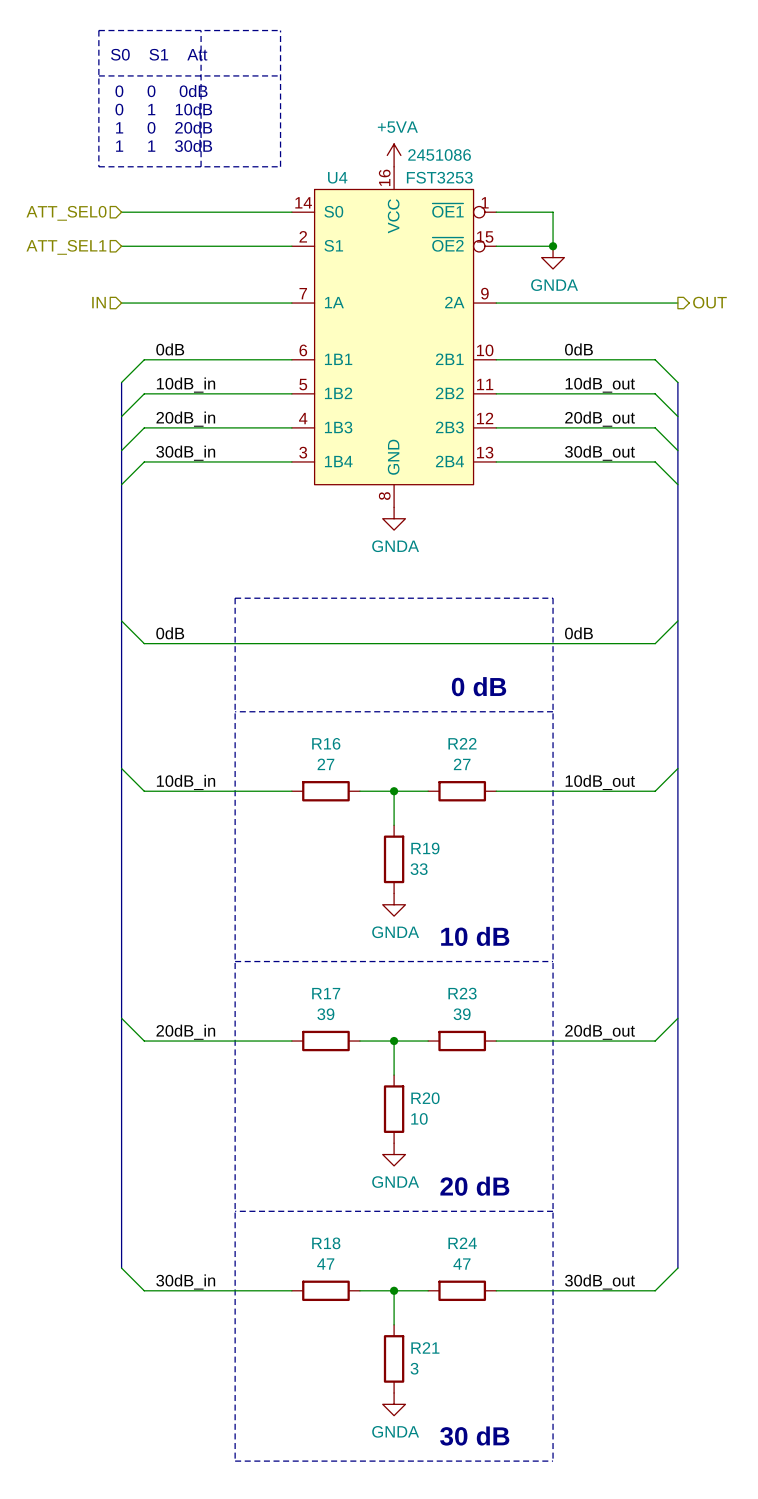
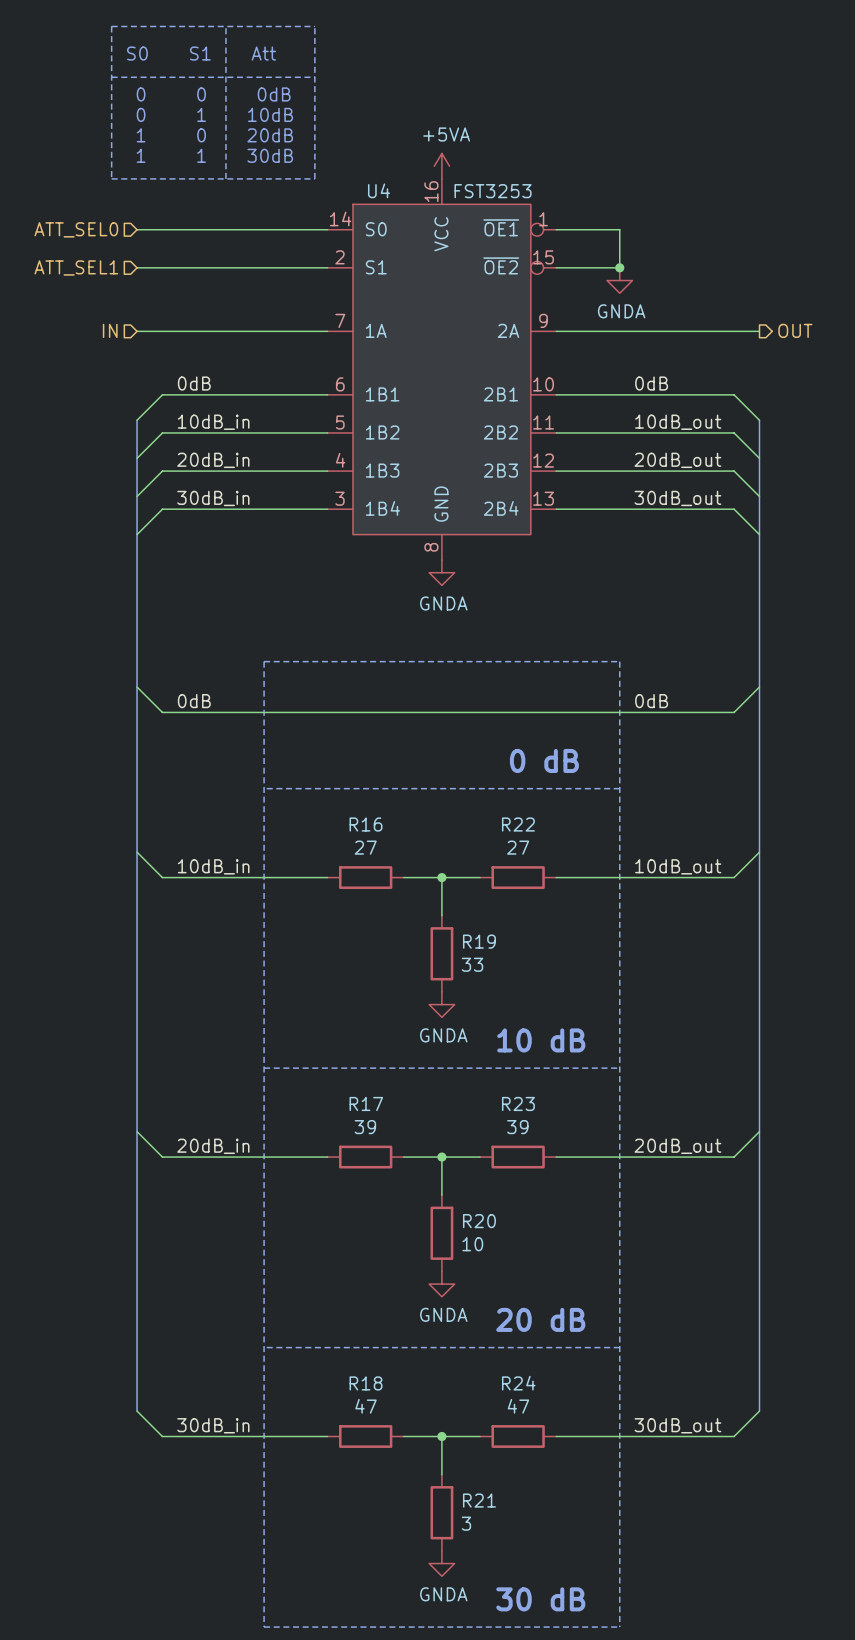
U4 text: 2451086 (439, 155) -> none

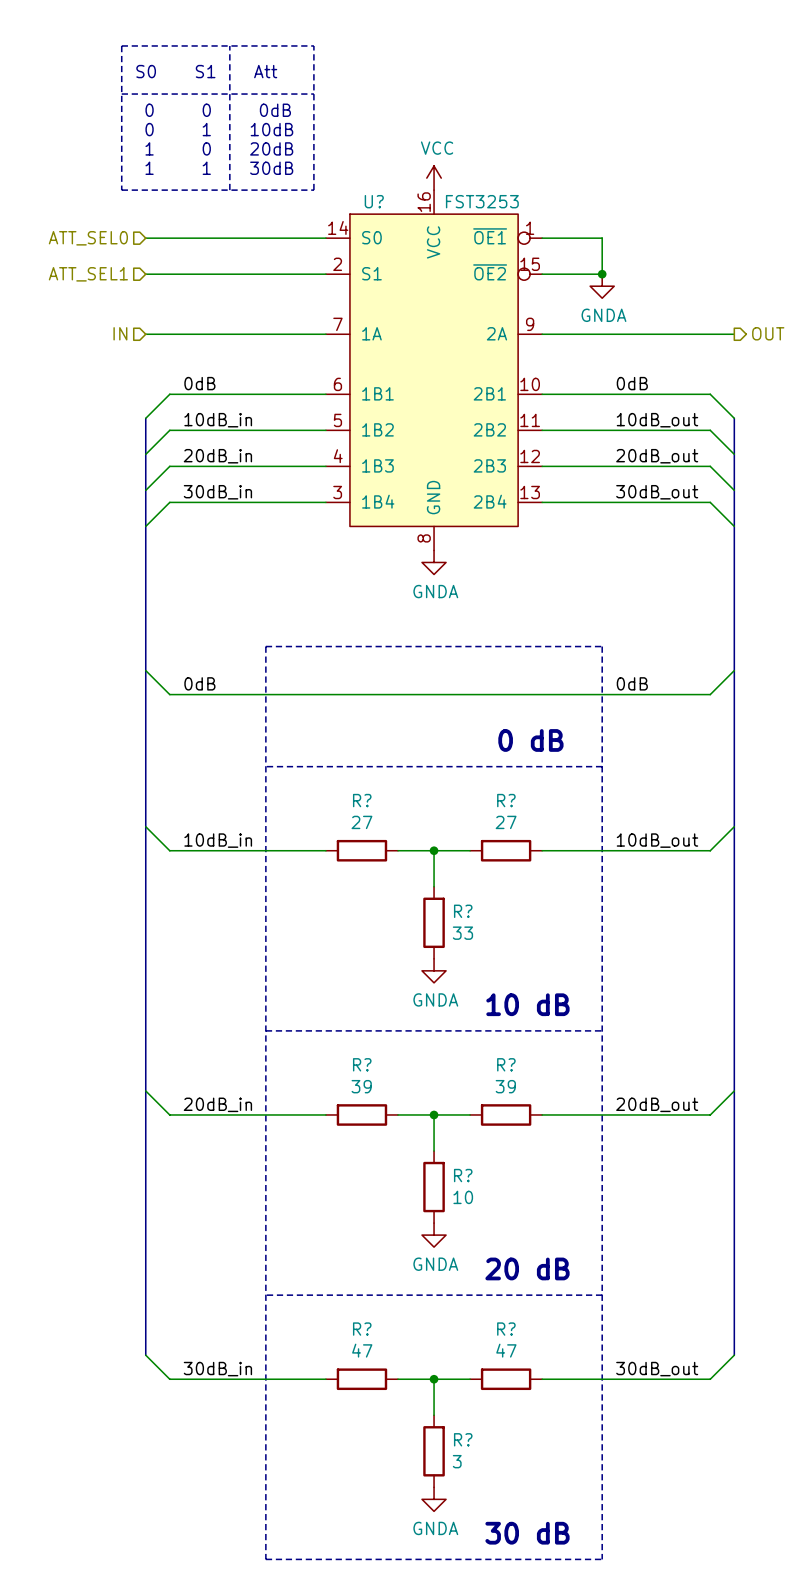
power symbol: +5VA (441, 166) -> VCC (434, 178)
U4 name: U4 (379, 190) -> U? (374, 201)
R16 name: R16 (366, 824) -> R? (362, 800)
R22 name: R22 (518, 824) -> R? (506, 800)
R19 name: R19 (479, 941) -> R? (463, 911)
R17 name: R17 (366, 1103) -> R? (362, 1064)
R23 name: R23 (518, 1103) -> R? (506, 1064)
R20 name: R20 (479, 1221) -> R? (463, 1175)
R18 name: R18 (366, 1383) -> R? (362, 1329)
R24 name: R24 (518, 1383) -> R? (506, 1329)
R21 name: R21 (479, 1500) -> R? (463, 1439)

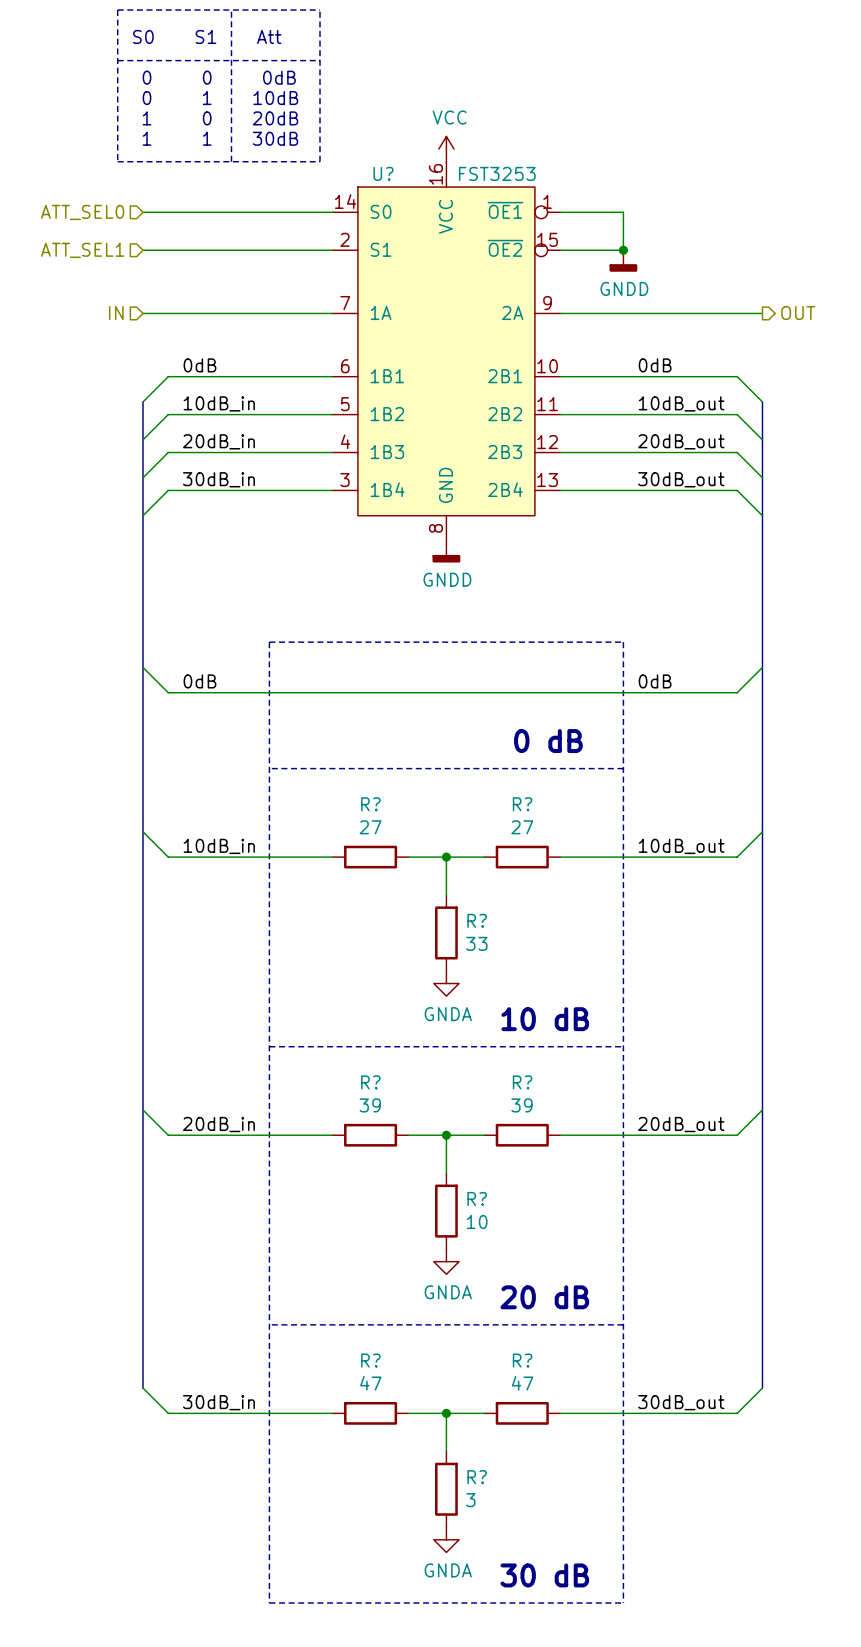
power symbol: GNDA (602, 286) -> GNDD (623, 260)
power symbol: GNDA (434, 562) -> GNDD (446, 551)

